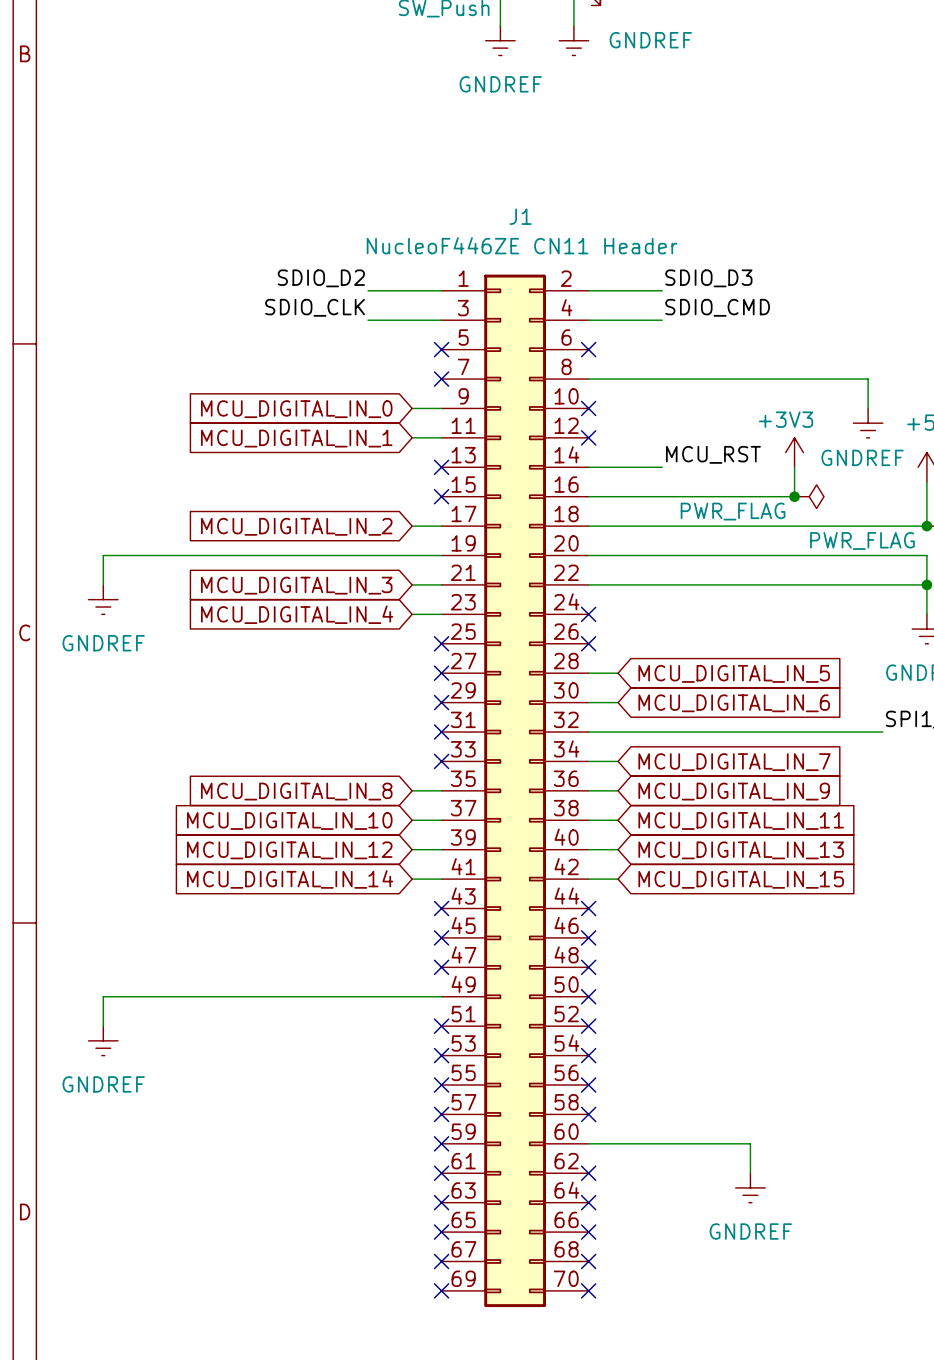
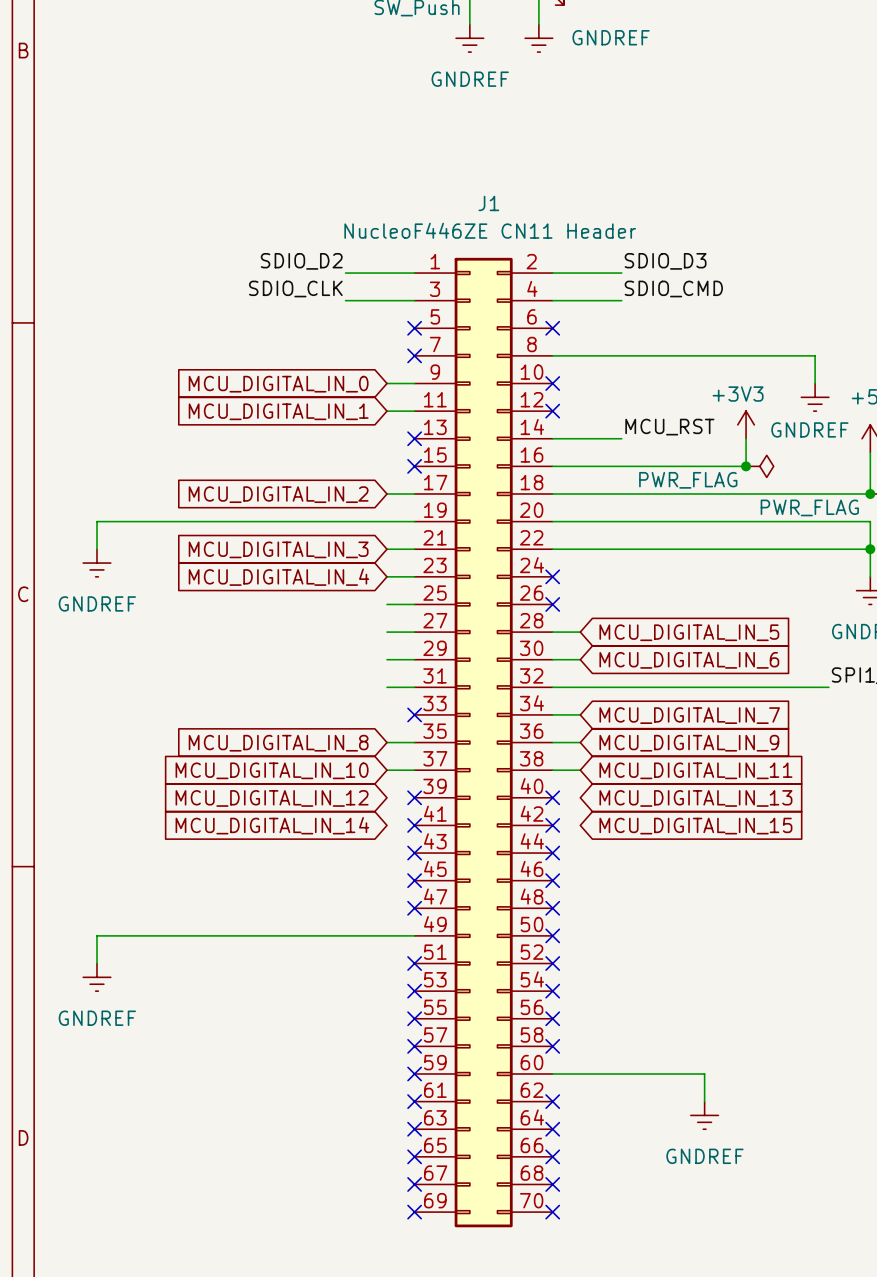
wire: none -> (386, 604) (414, 604)
no-connect mark: (441, 643) -> none
no-connect mark: (441, 673) -> none
no-connect mark: (441, 702) -> none
no-connect mark: (441, 732) -> none
wire: (412, 849) (441, 849) -> (386, 659) (414, 659)
no-connect mark: none -> (414, 797)
wire: (588, 849) (618, 849) -> (386, 632) (414, 632)
no-connect mark: none -> (552, 797)
wire: (412, 879) (441, 879) -> (386, 687) (414, 687)
no-connect mark: none -> (414, 825)
wire: (588, 879) (618, 879) -> none
no-connect mark: none -> (552, 825)

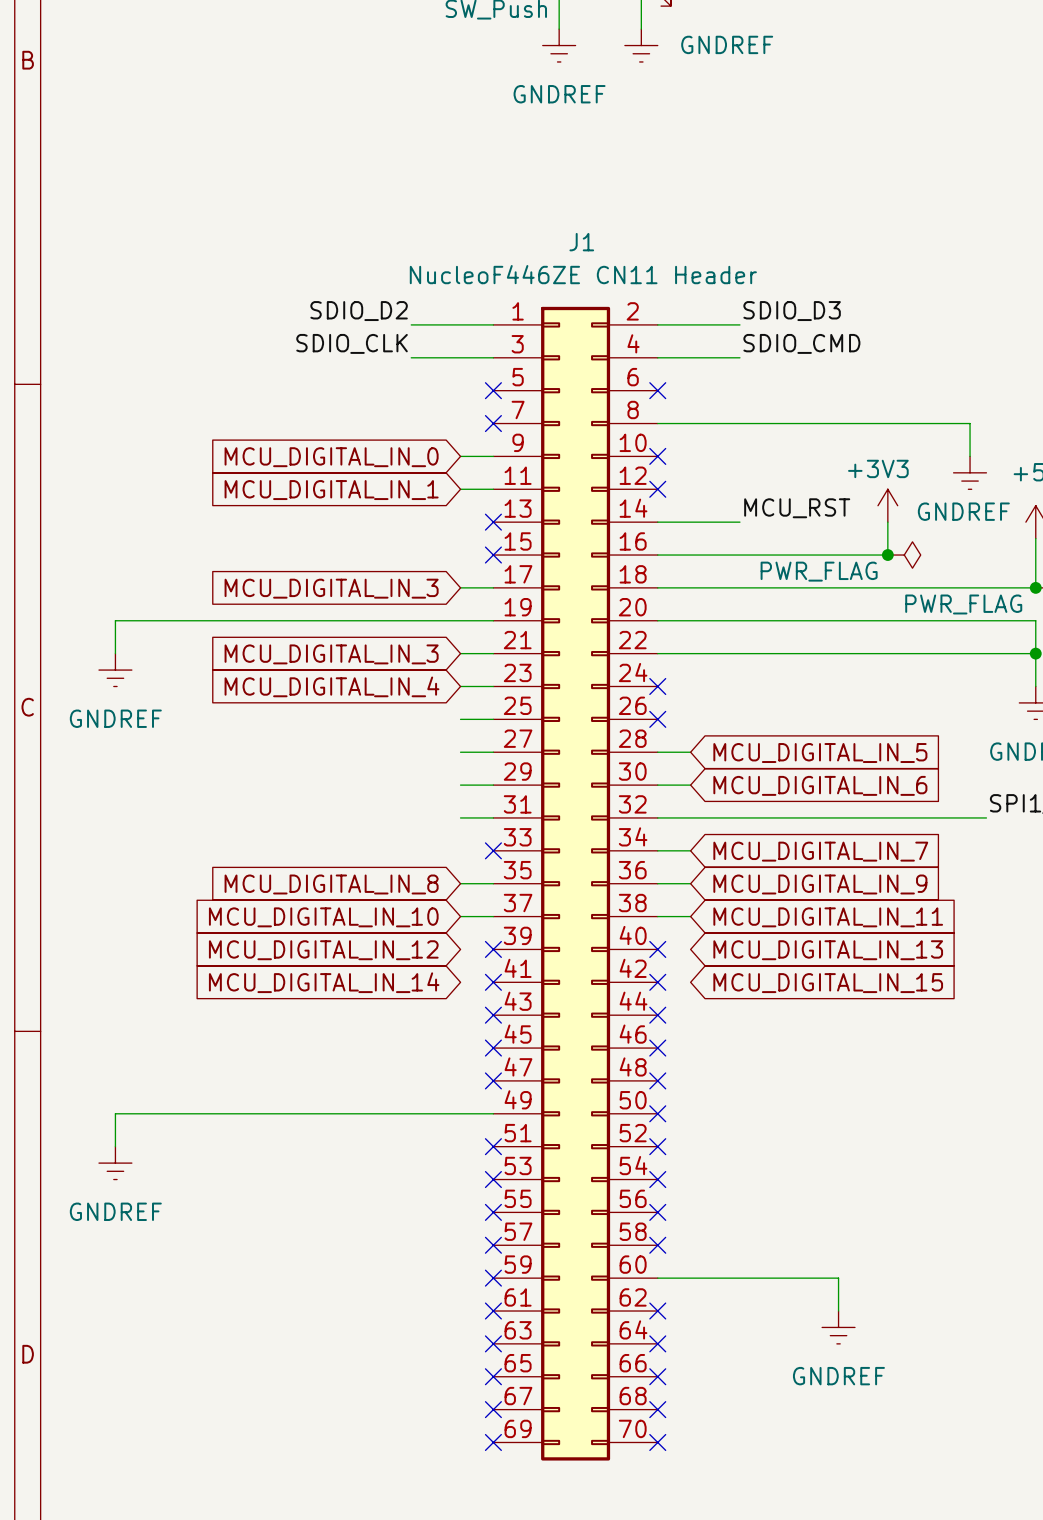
global label: MCU_DIGITAL_IN_2 (278, 494) -> MCU_DIGITAL_IN_3 (331, 588)

